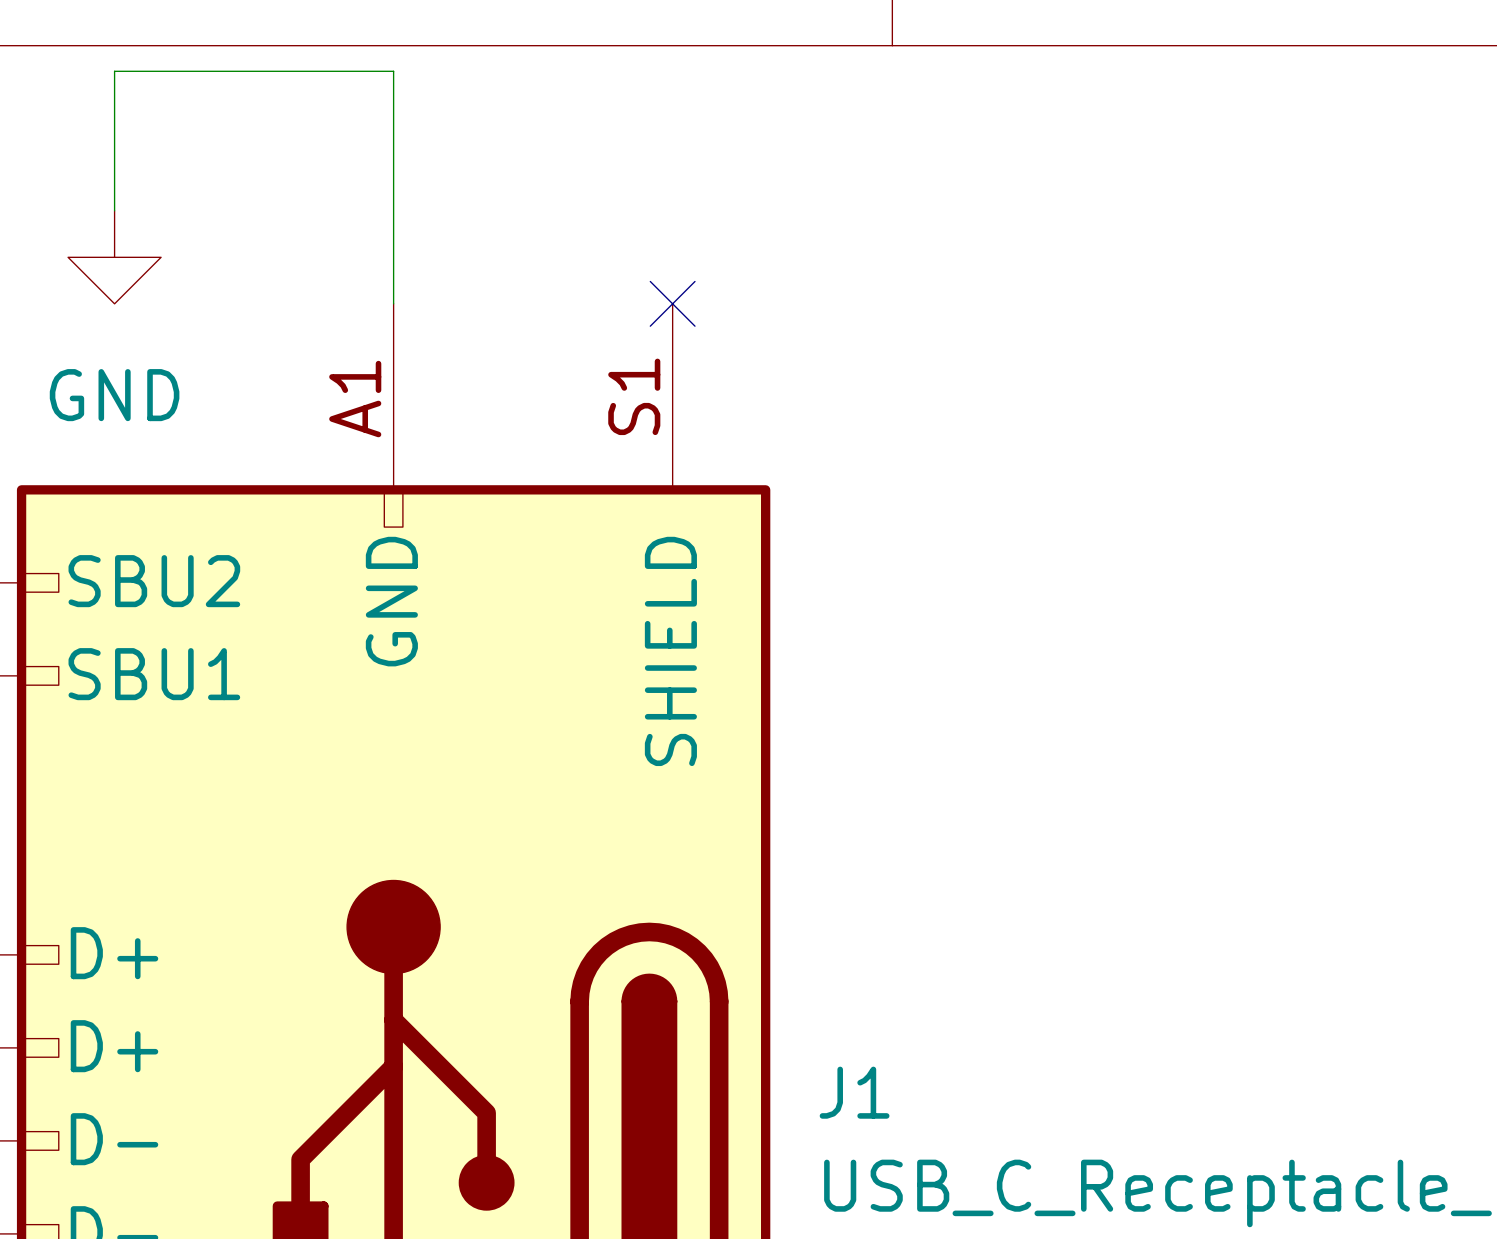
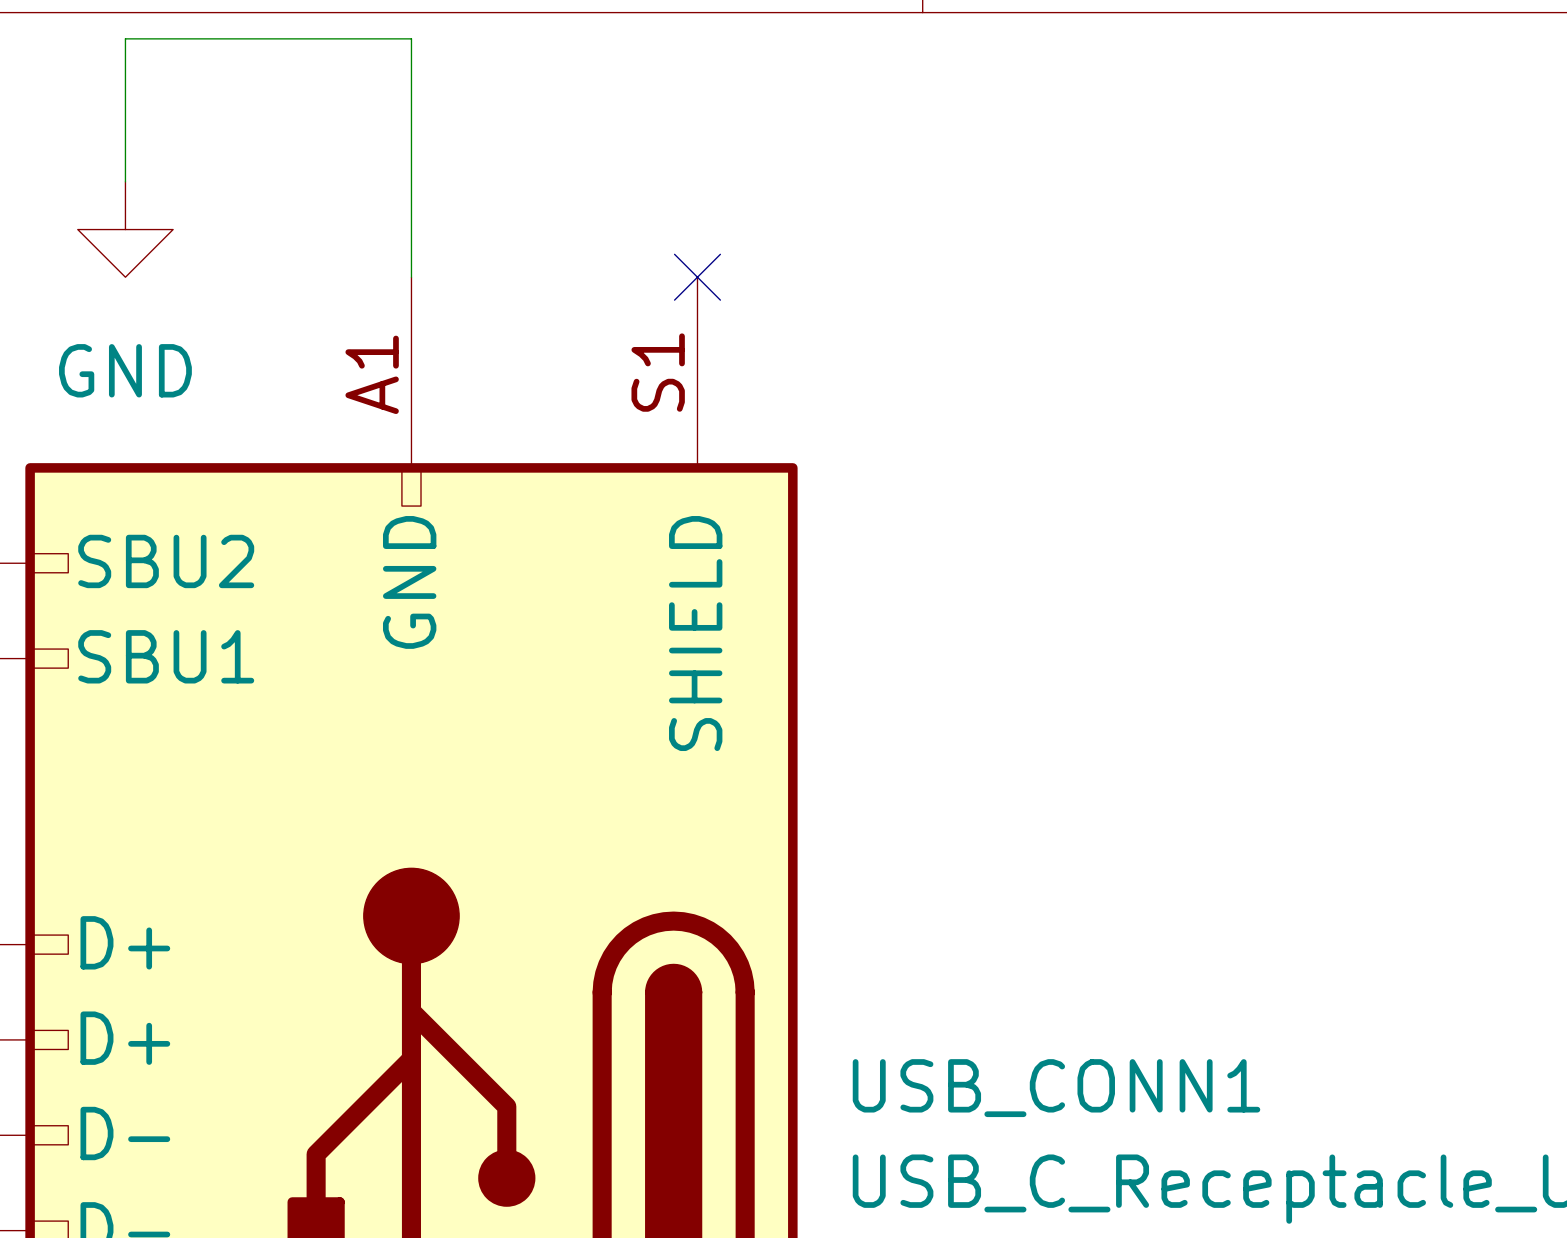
J1 name: J1 (854, 1092) -> USB_CONN1 (1056, 1088)

